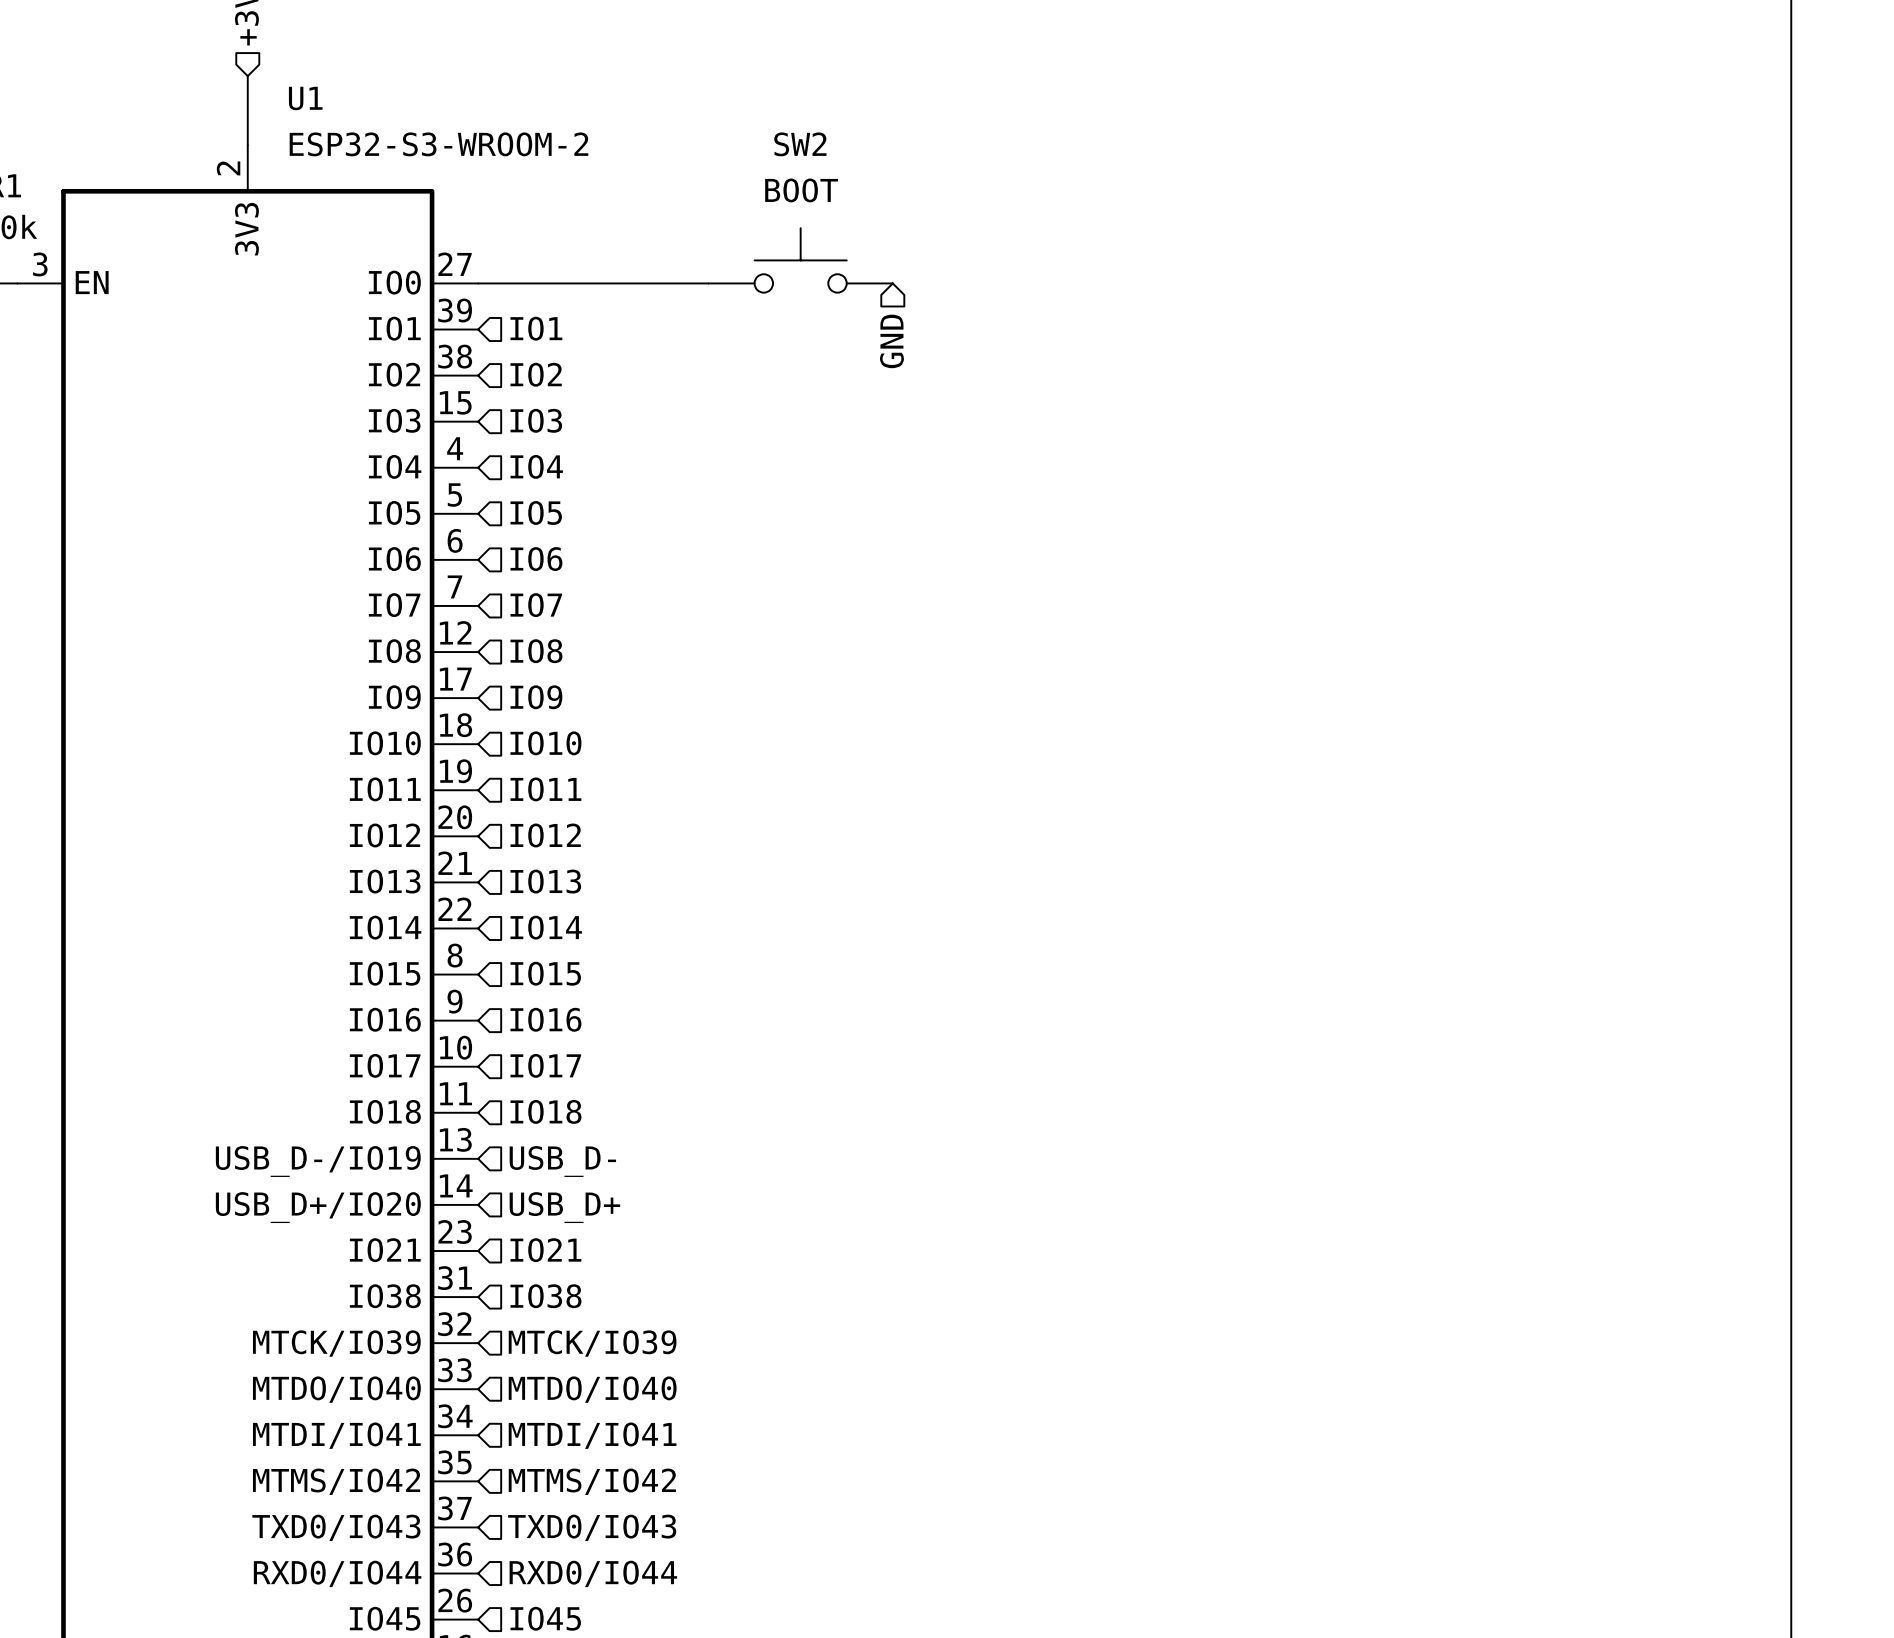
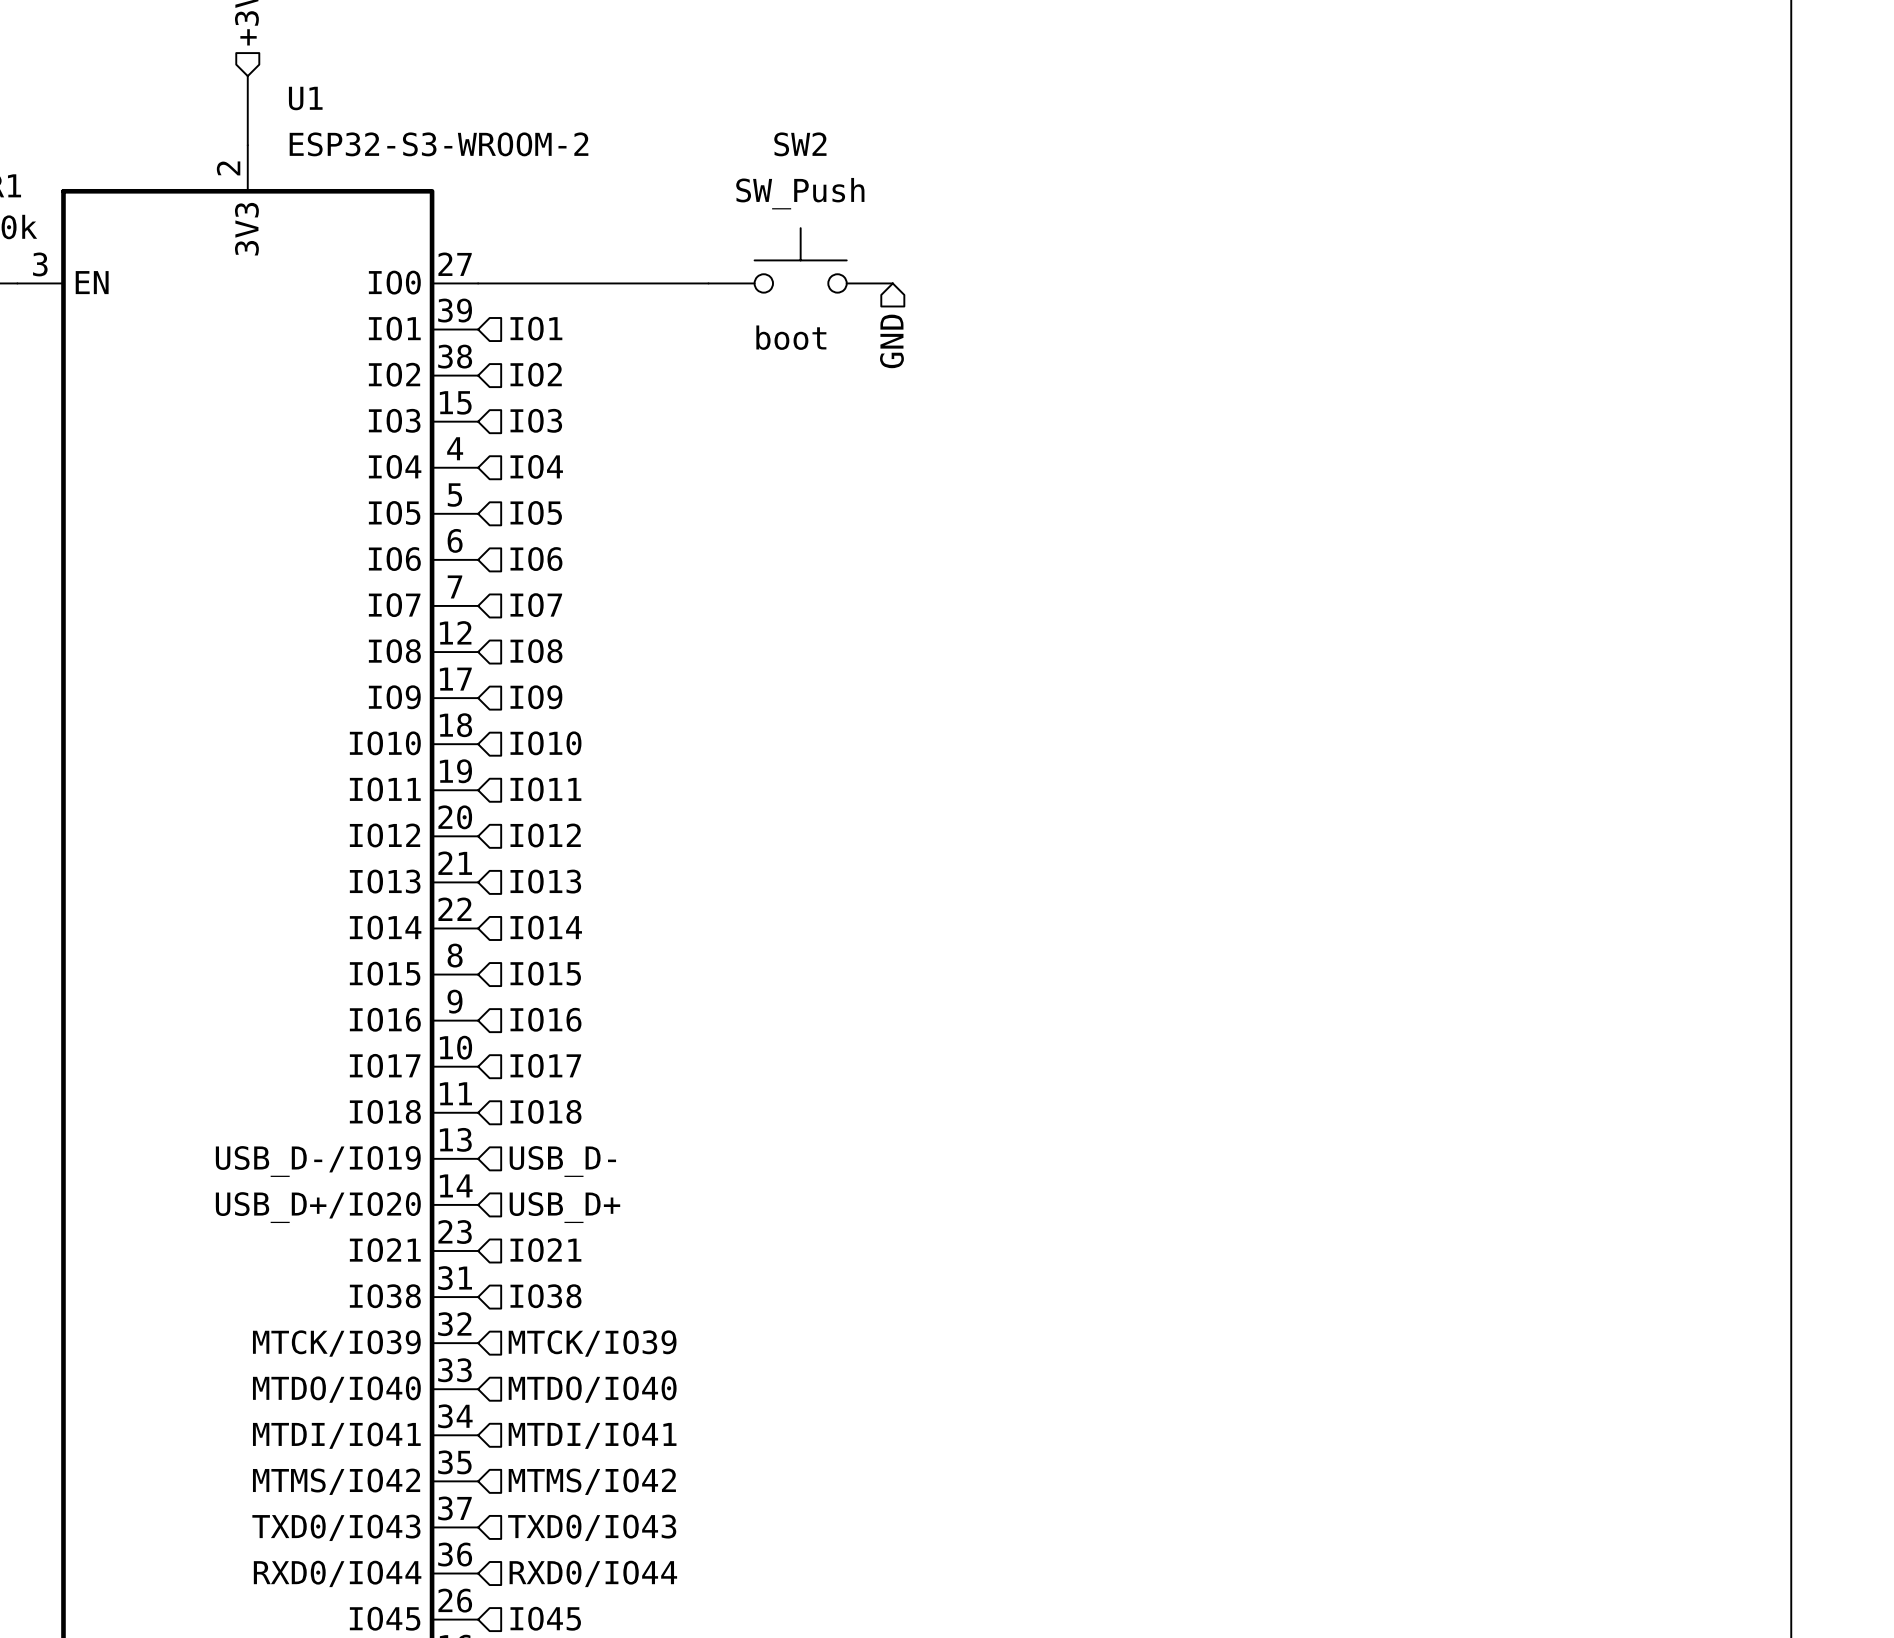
SW2 value: BOOT (801, 190) -> SW_Push (800, 193)
text: none -> boot (791, 337)

